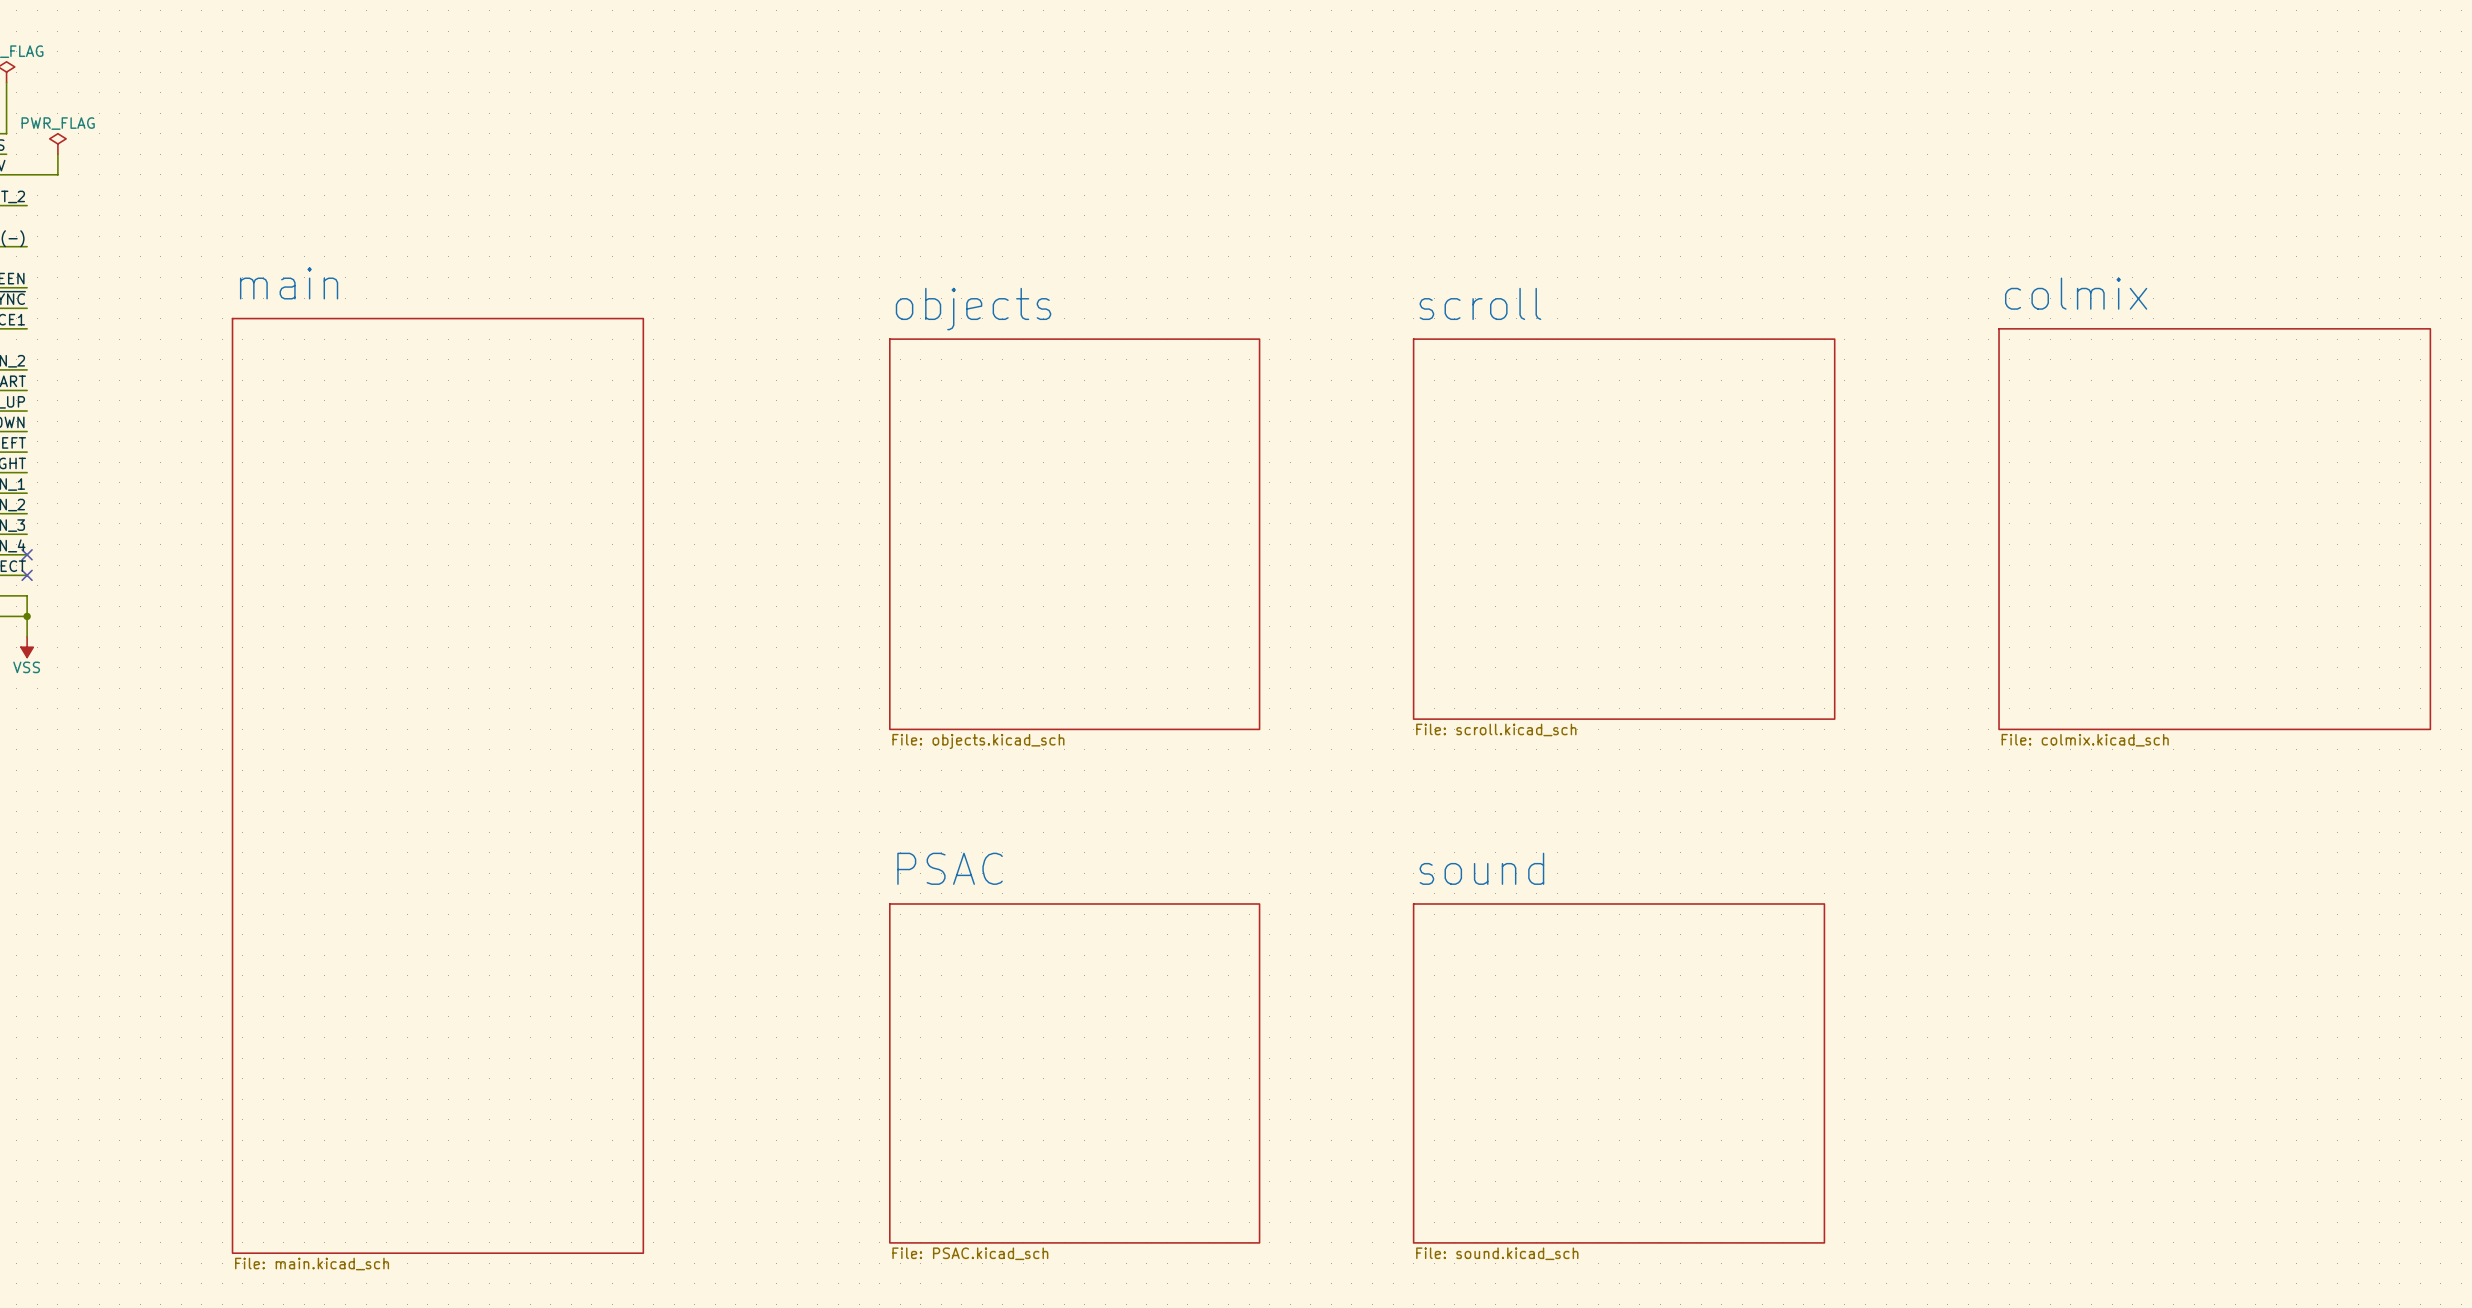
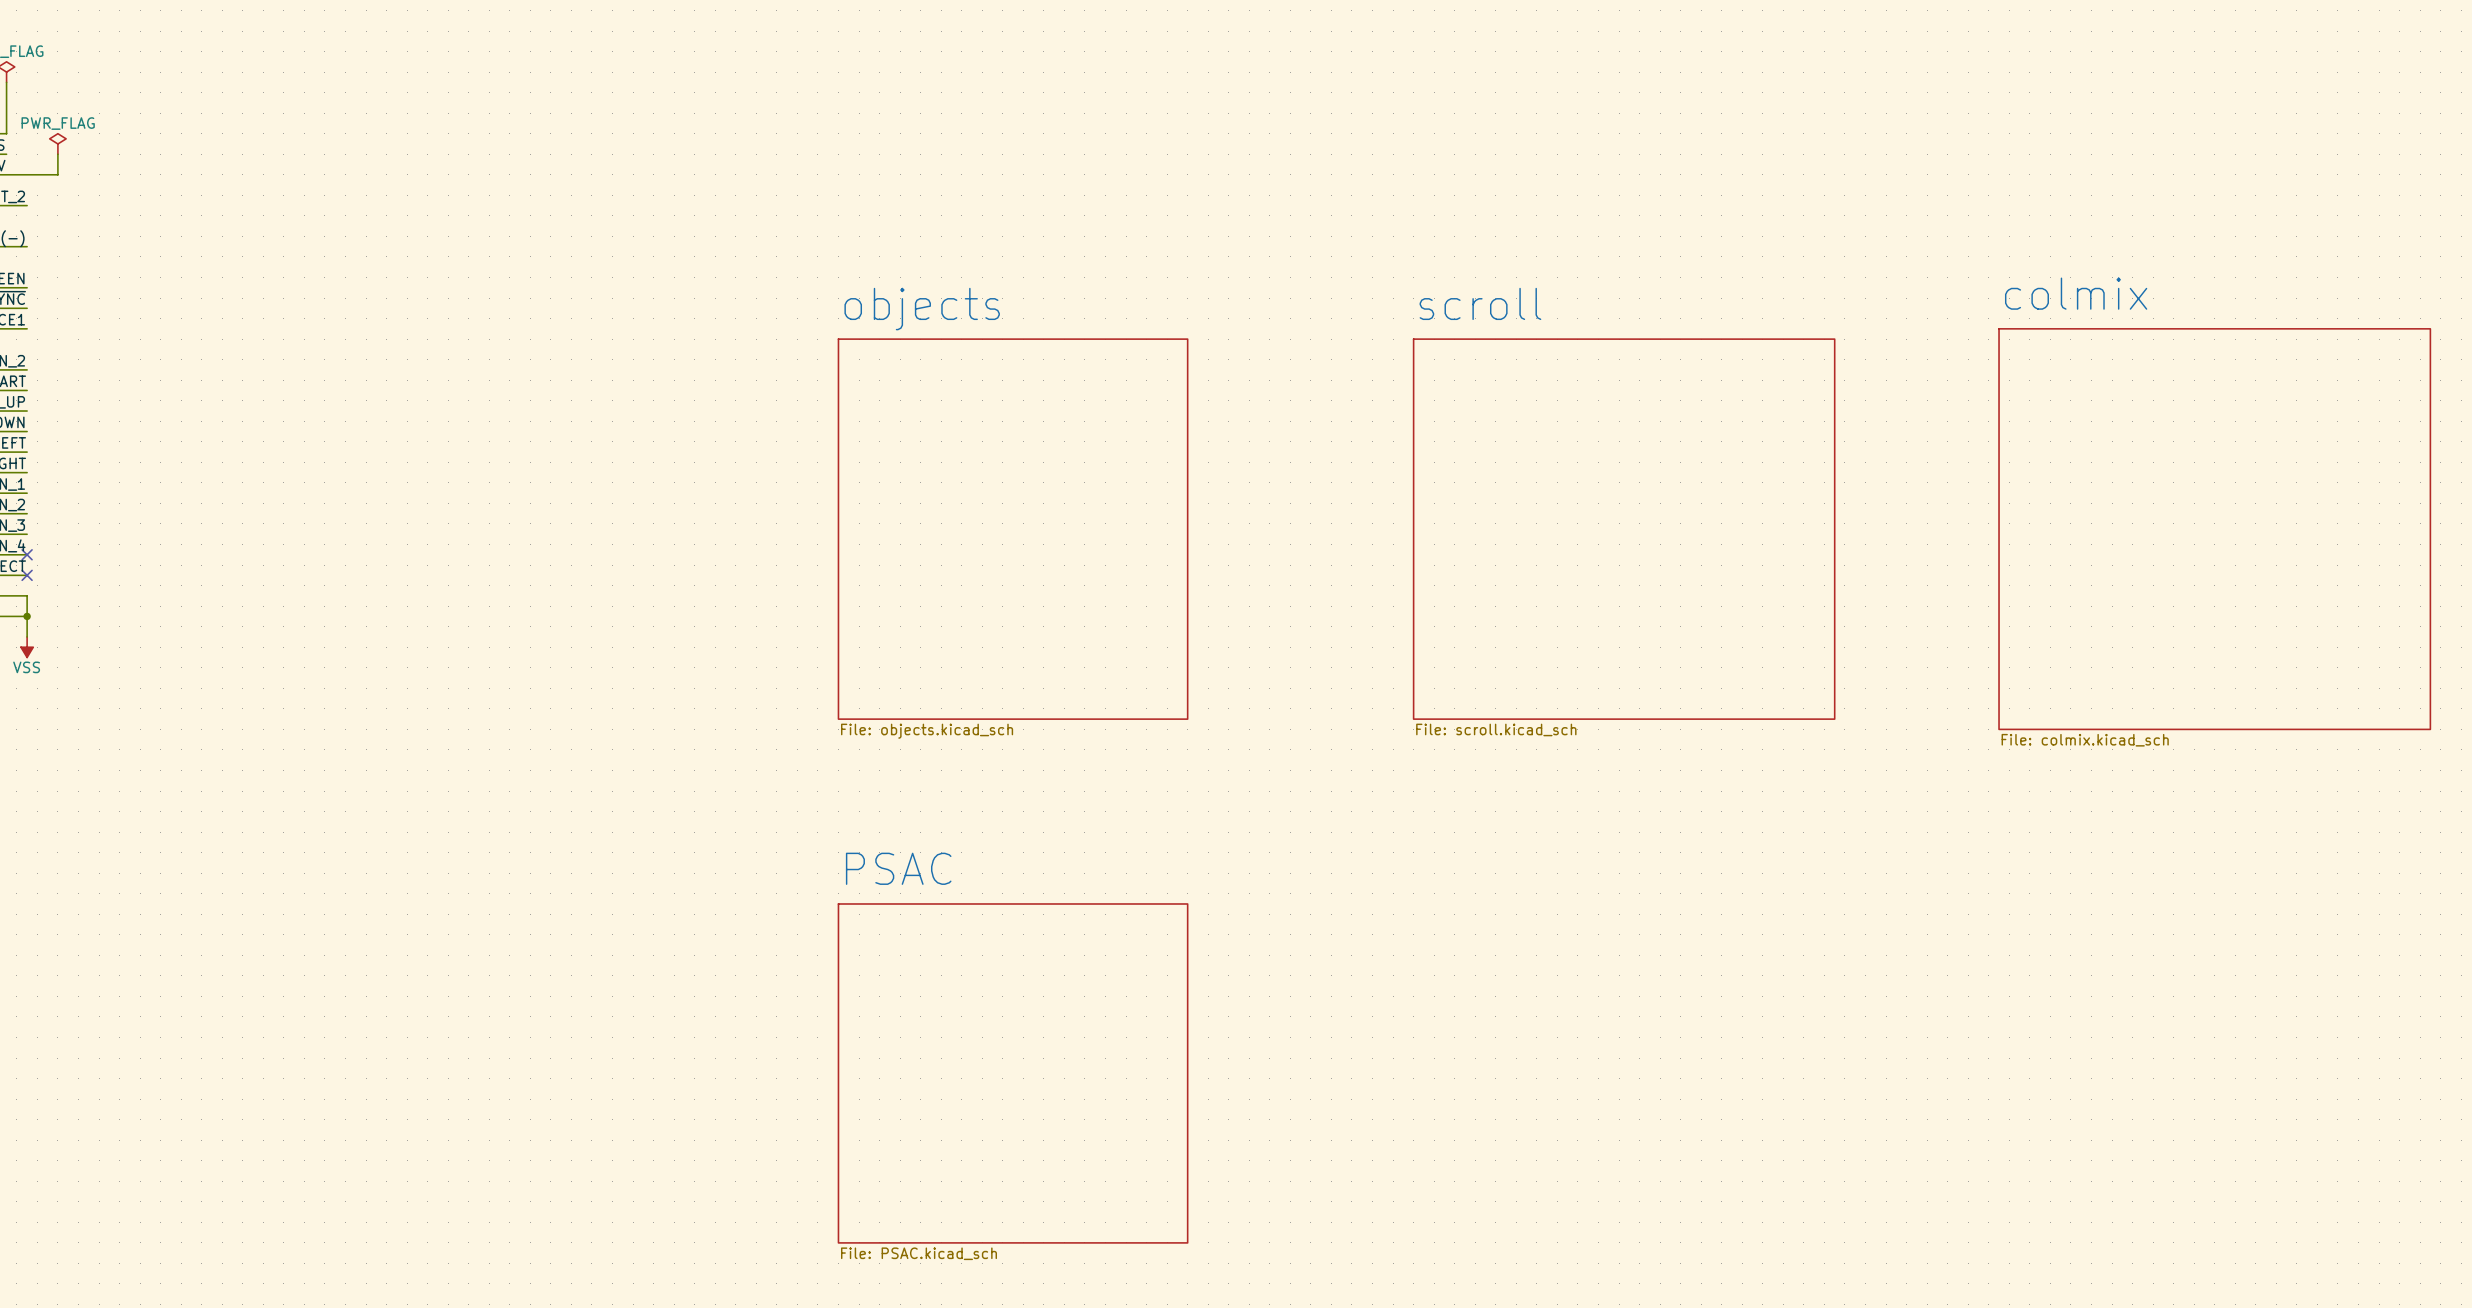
sheet objects: none -> File: objects.kicad_sch (1013, 529)
sheet objects: File: objects.kicad_sch (1074, 534) -> none
sheet main: File: main.kicad_sch (437, 785) -> none
sheet PSAC: none -> File: PSAC.kicad_sch (1013, 1073)
sheet PSAC: File: PSAC.kicad_sch (1074, 1073) -> none
sheet sound: File: sound.kicad_sch (1619, 1073) -> none

